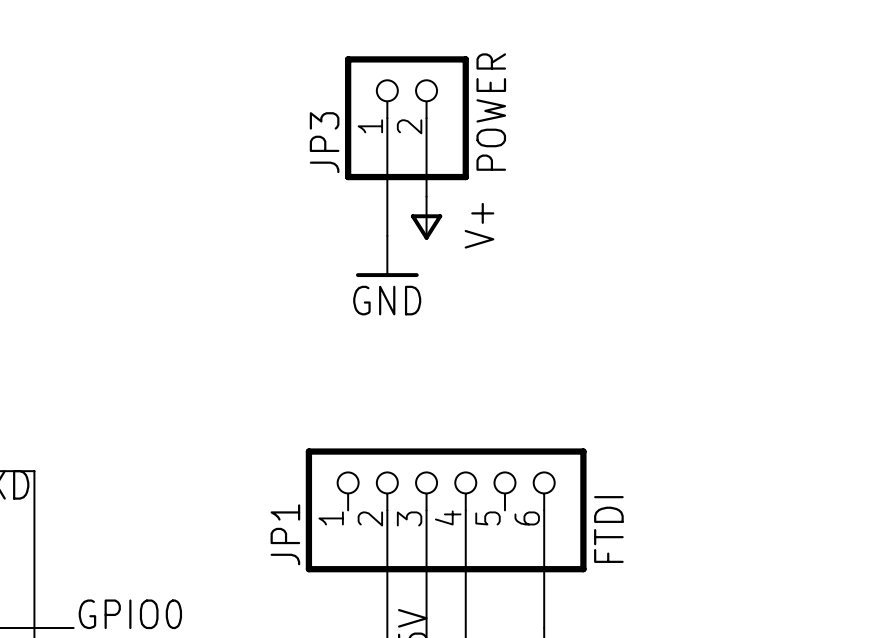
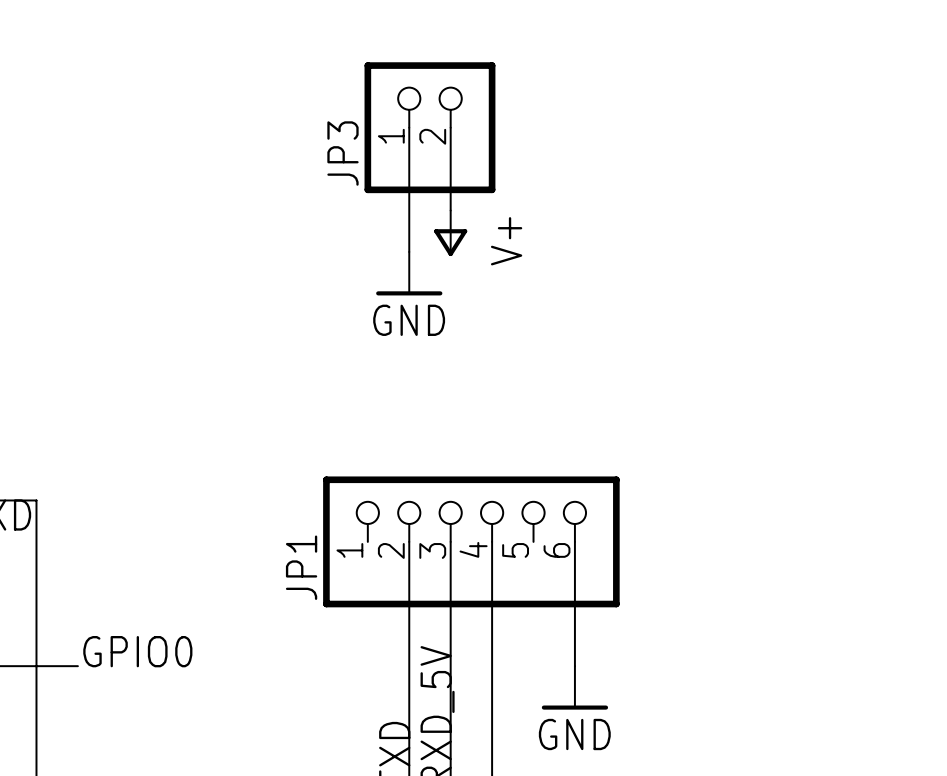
JP3 value: POWER (491, 112) -> none
JP1 value: FTDI (608, 529) -> none

